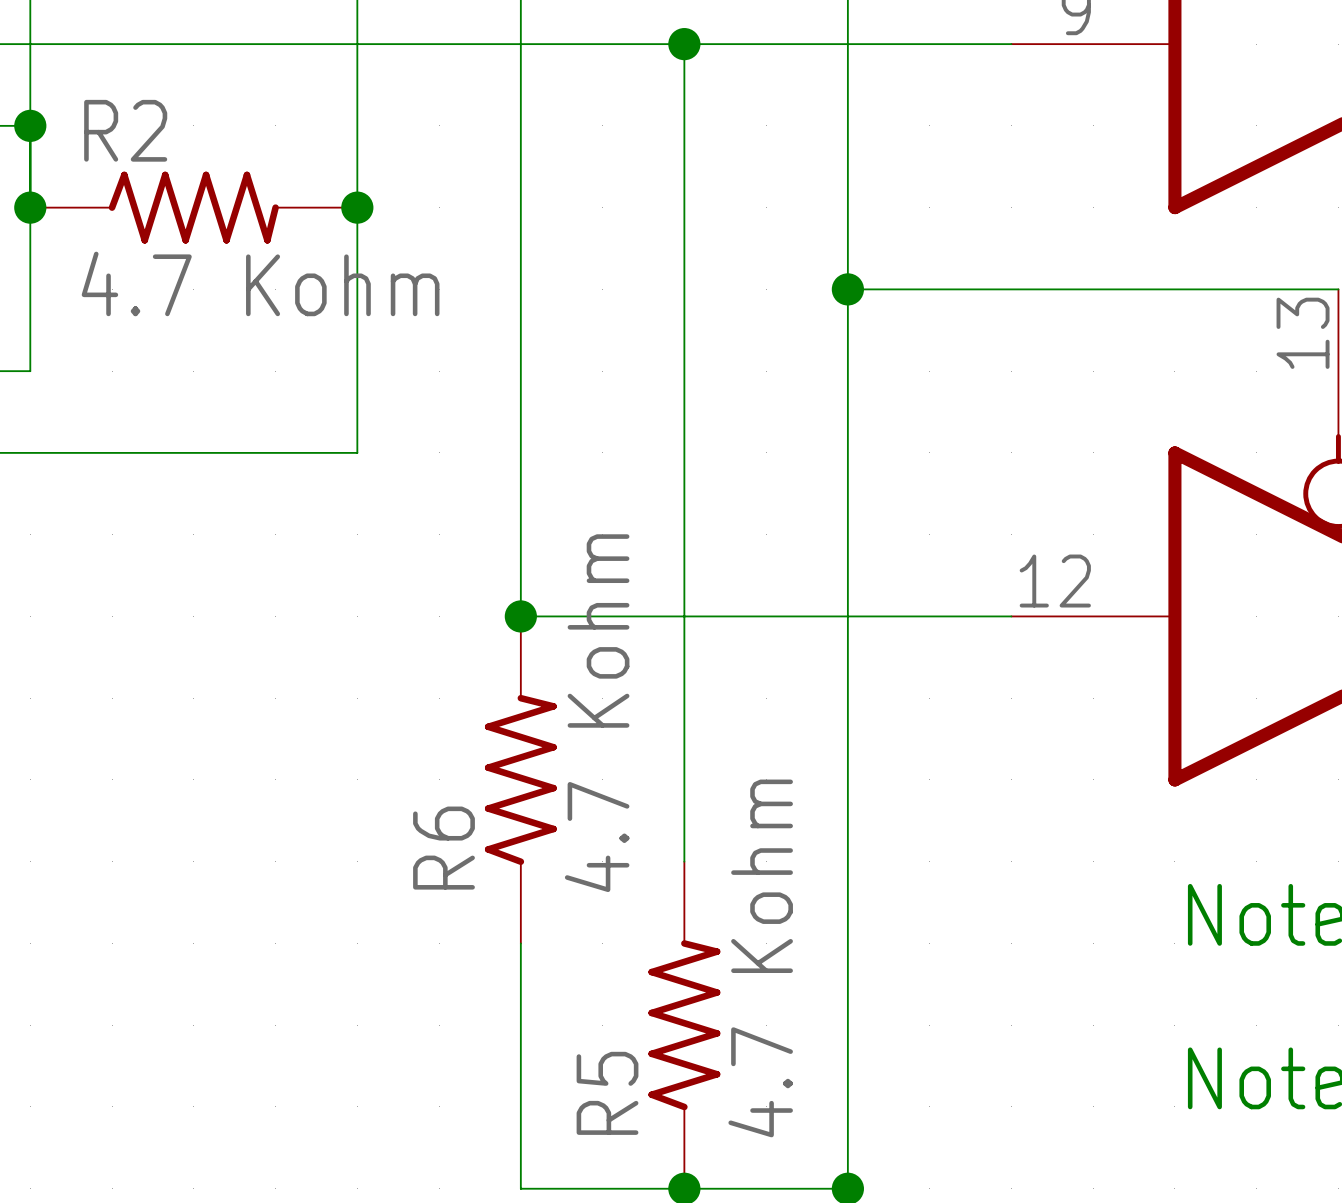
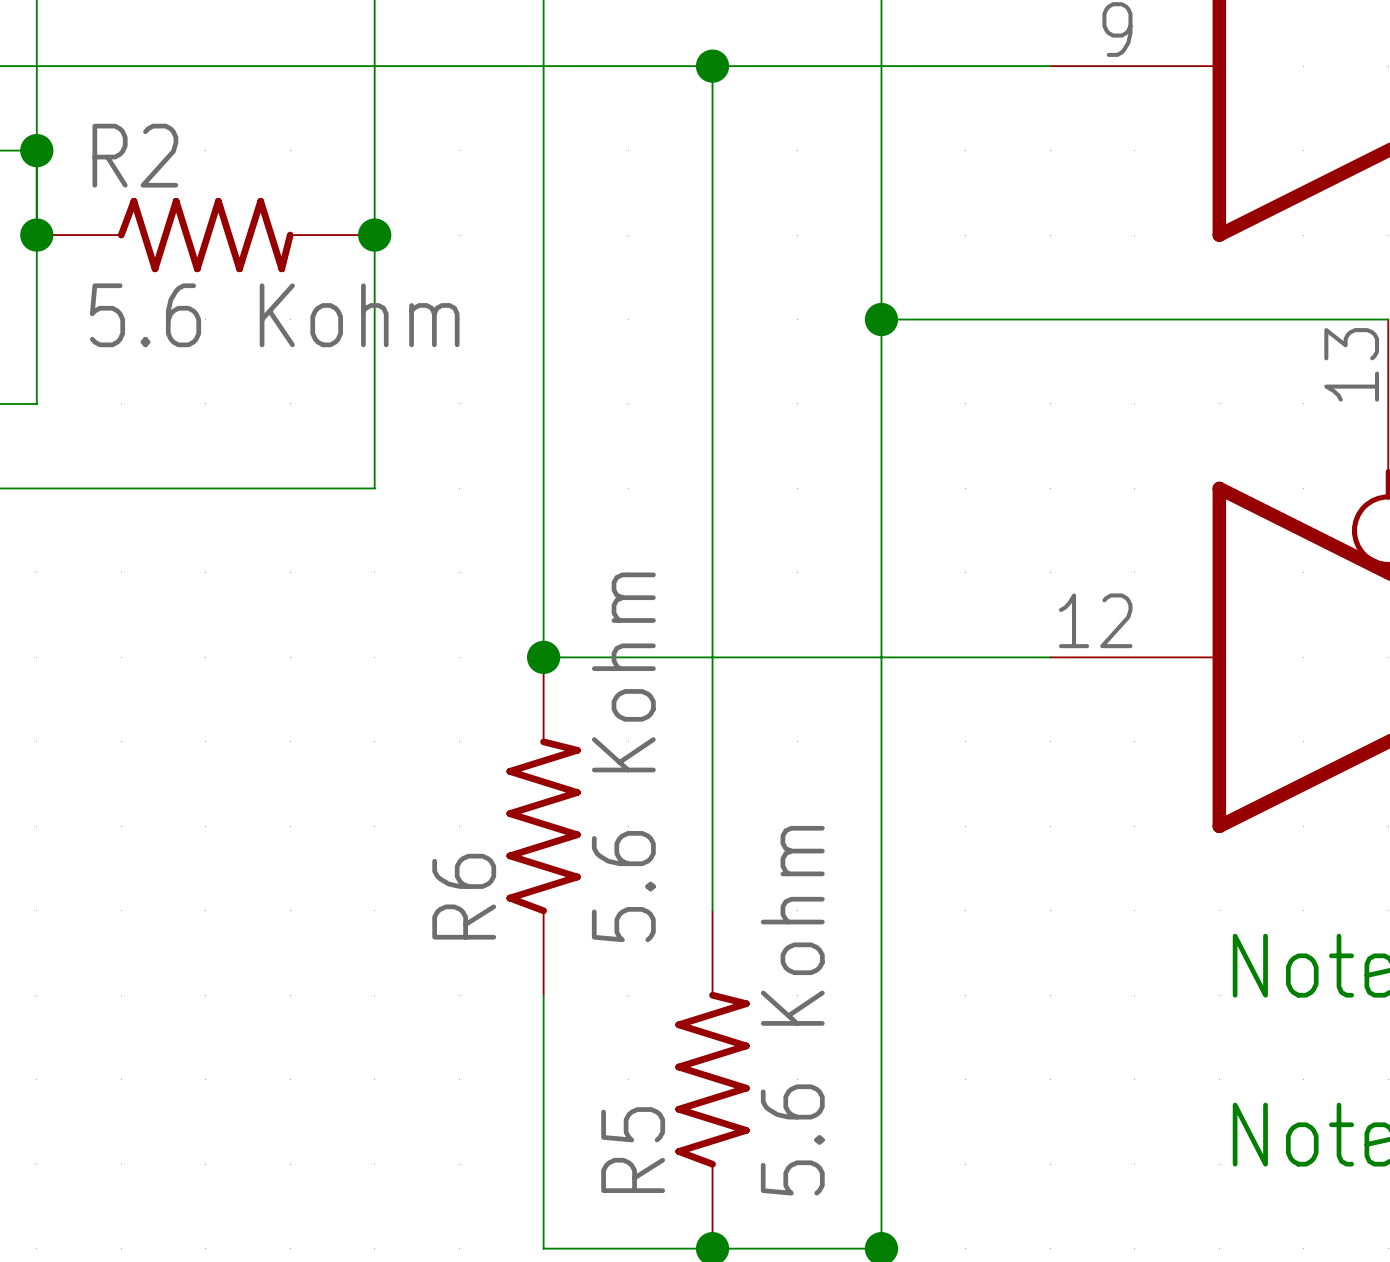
R2 value: 4.7 Kohm (260, 283) -> 5.6 Kohm (274, 315)
R6 value: 4.7 Kohm (597, 713) -> 5.6 Kohm (623, 757)
R5 value: 4.7 Kohm (760, 958) -> 5.6 Kohm (792, 1010)

